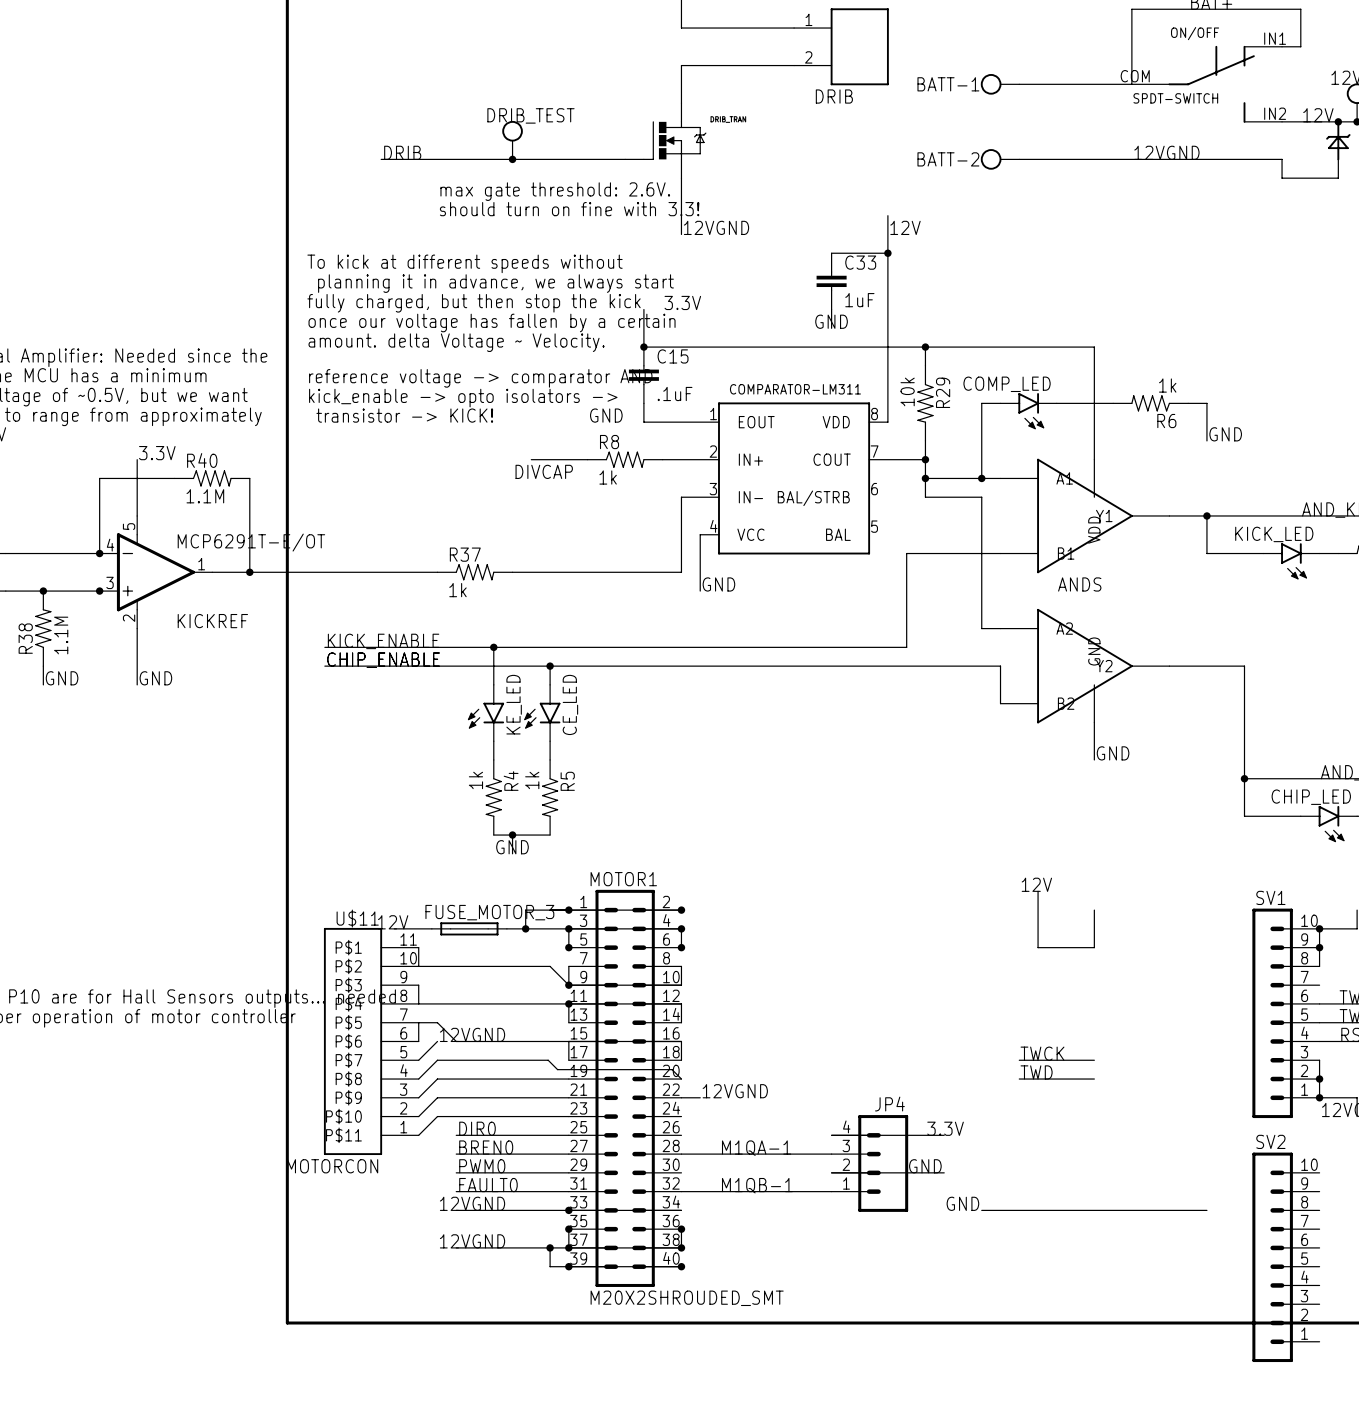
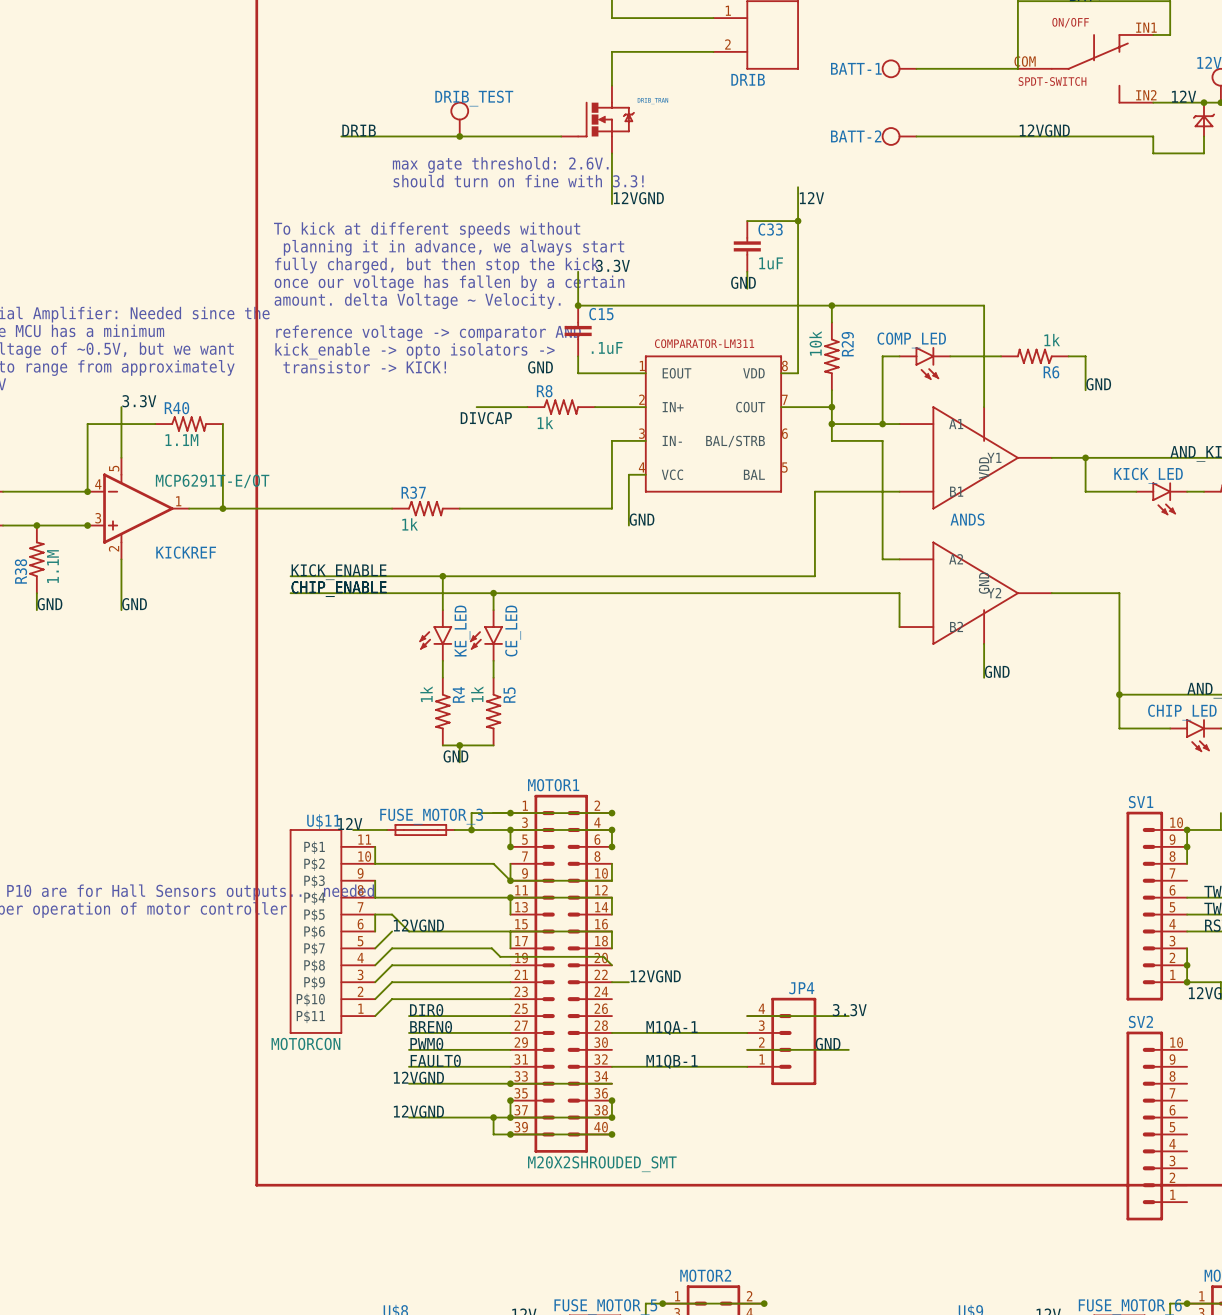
label: 12V (1036, 884) -> none
wire: (1038, 891) (1038, 947) (1094, 947) (1094, 910) -> none
label: TWCK (1042, 1053) -> none
wire: (1019, 1060) (1094, 1060) -> none
label: TWD (1036, 1072) -> none
wire: (1019, 1079) (1094, 1079) -> none
label: GND (962, 1203) -> none
wire: (981, 1210) (1206, 1210) -> none

